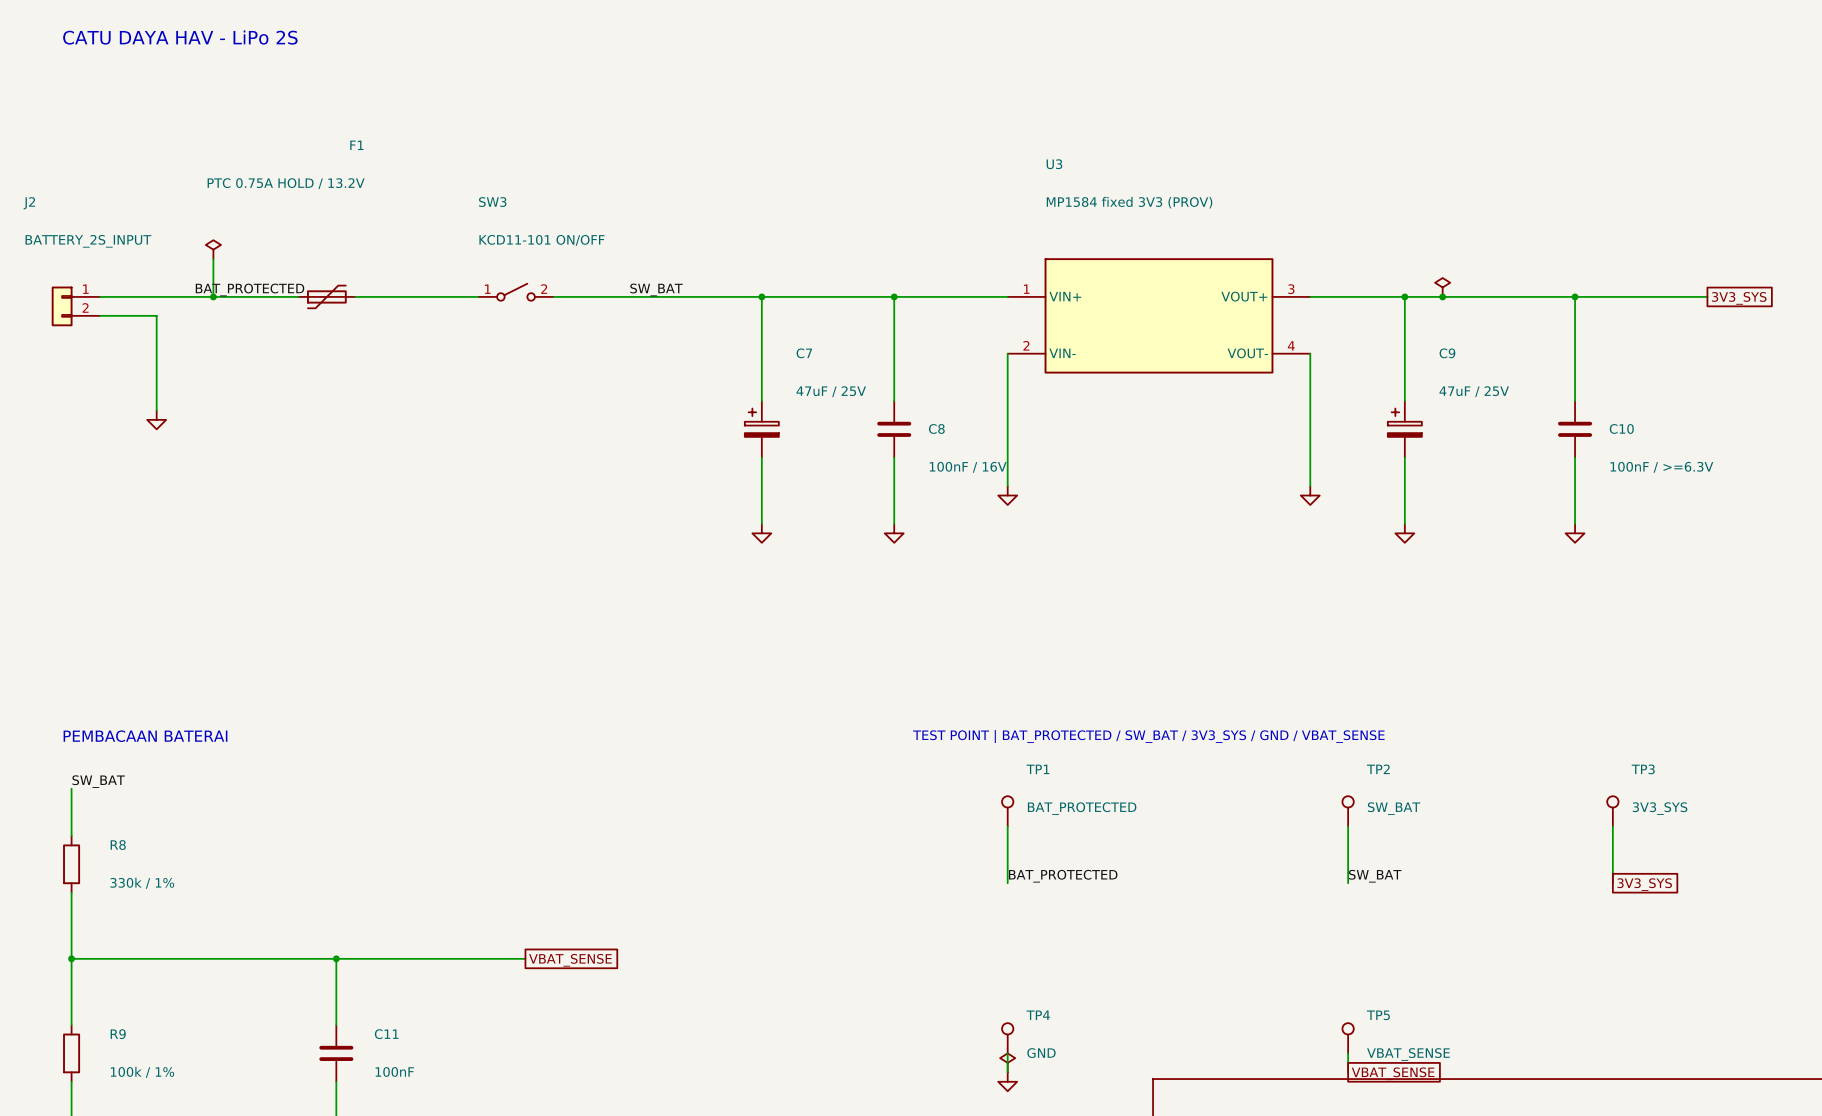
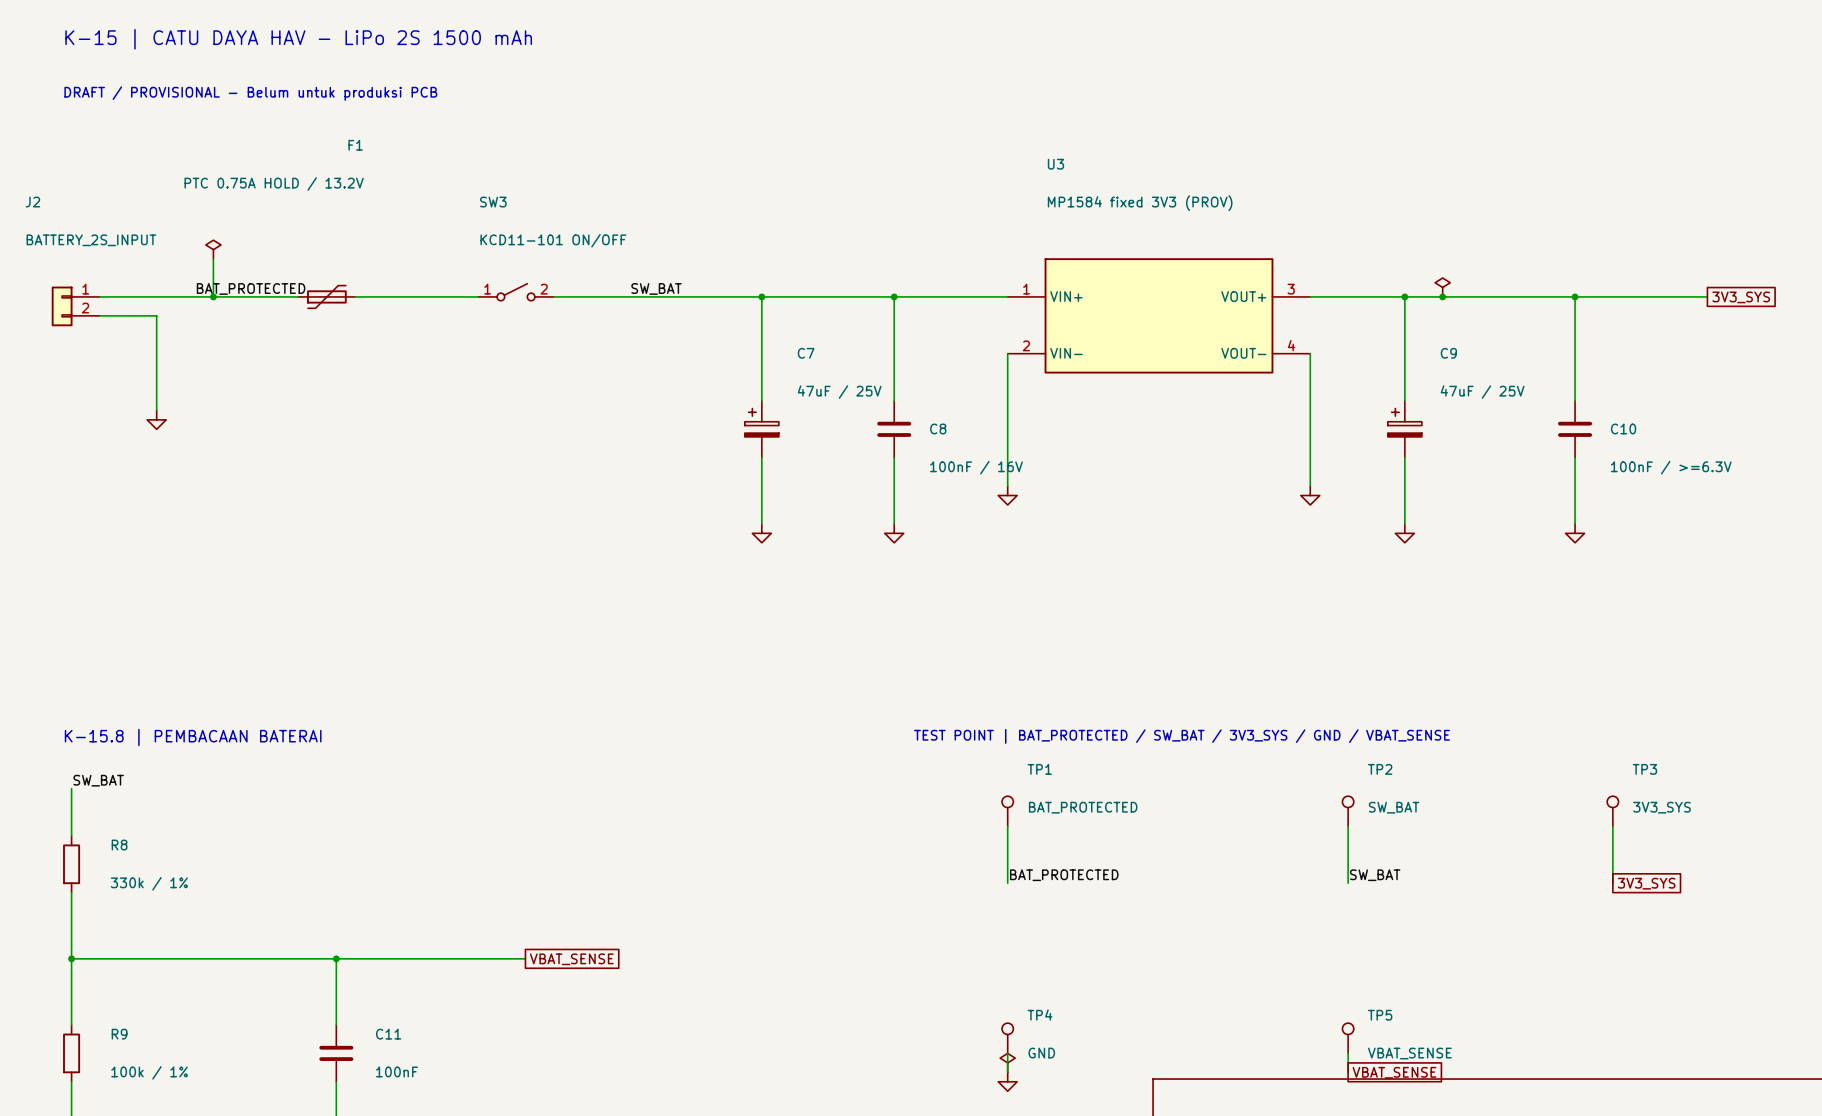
text: CATU DAYA HAV - LiPo 2S (180, 37) -> K-15 | CATU DAYA HAV - LiPo 2S 1500 mAh (298, 39)
text: none -> DRAFT / PROVISIONAL - Belum untuk produksi PCB (250, 93)
text: PEMBACAAN BATERAI (145, 736) -> K-15.8 | PEMBACAAN BATERAI (193, 737)

